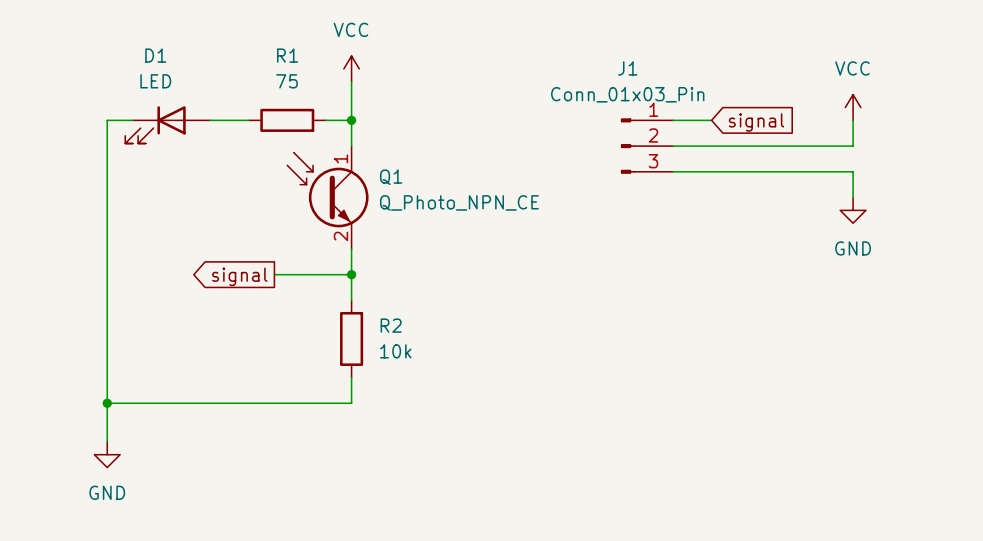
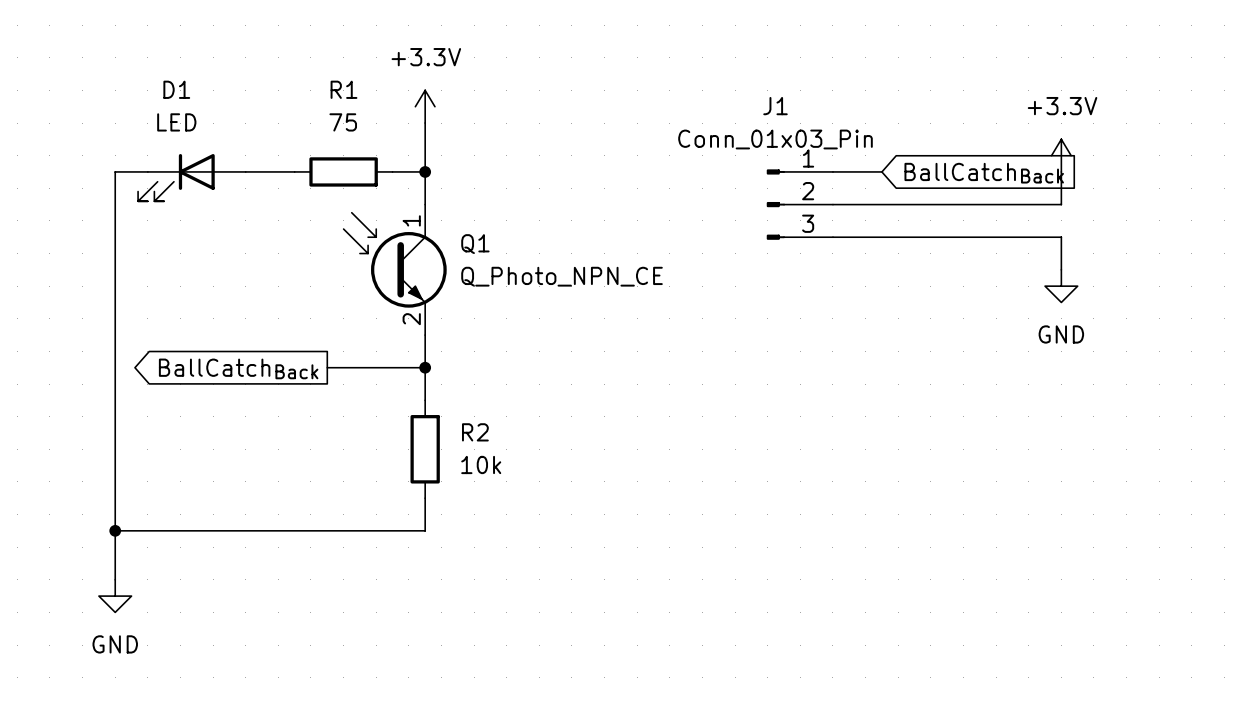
power symbol: VCC (351, 68) -> +3.3V (425, 106)
power symbol: VCC (853, 107) -> +3.3V (1061, 155)
global label: signal (756, 122) -> BallCatchBack (984, 173)
global label: signal (239, 276) -> BallCatchBack (238, 368)

